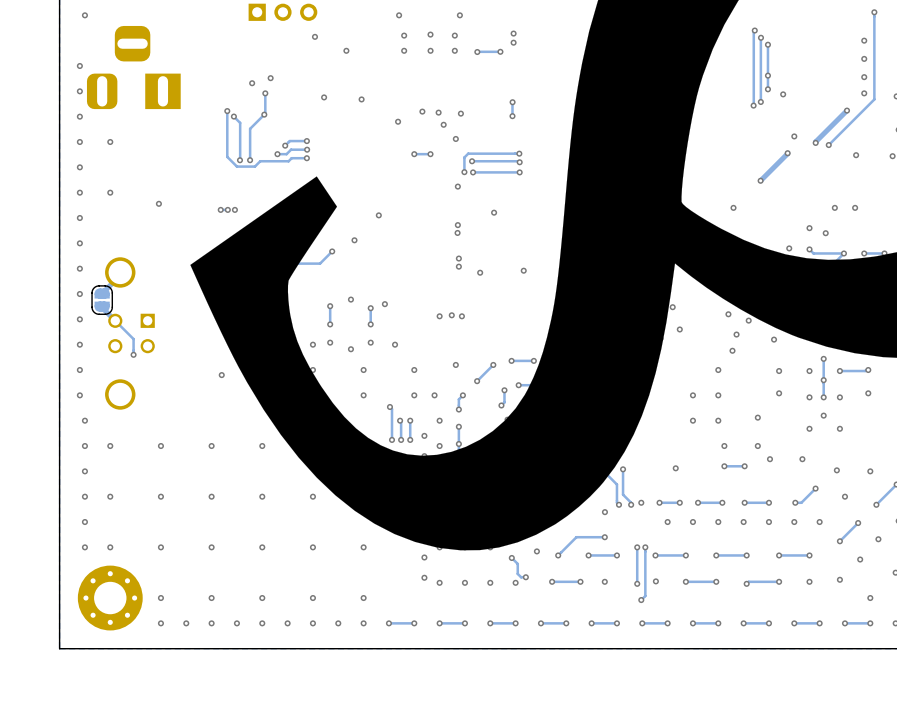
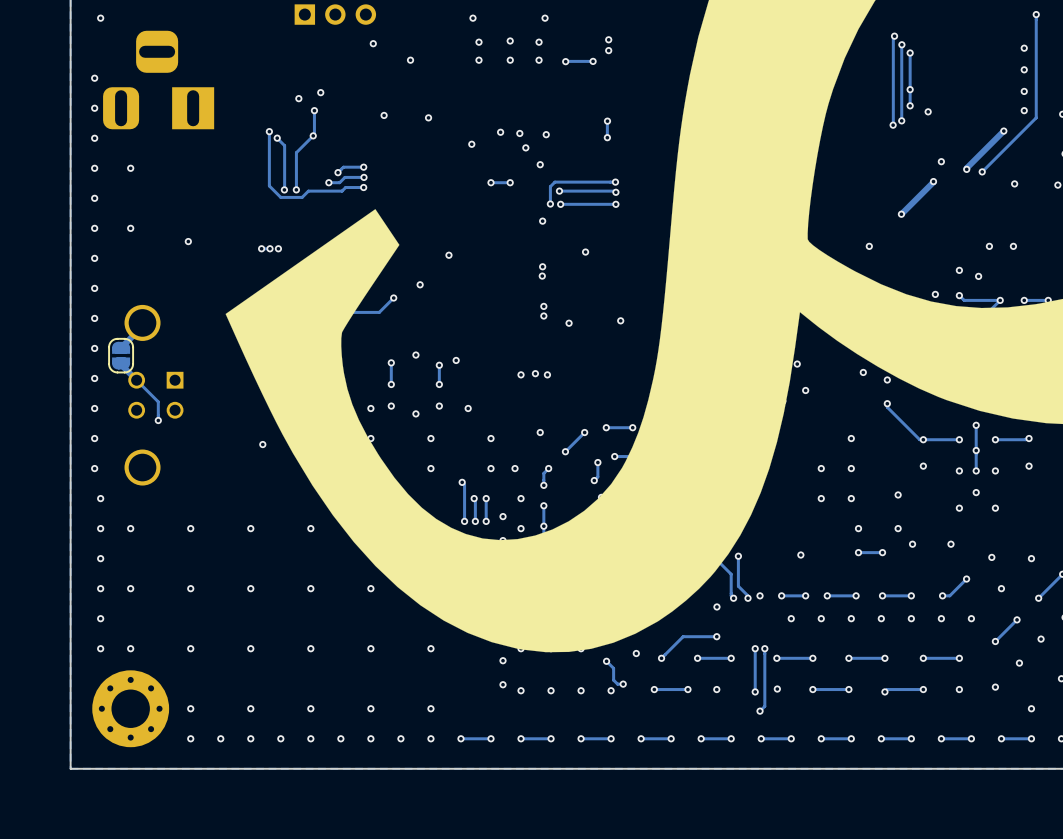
via: (736, 334) -> none
via: (774, 339) -> none
track: none -> (887, 403) (887, 407) (919, 439) (959, 439)
via: none -> (887, 403)
via: (732, 350) -> none

